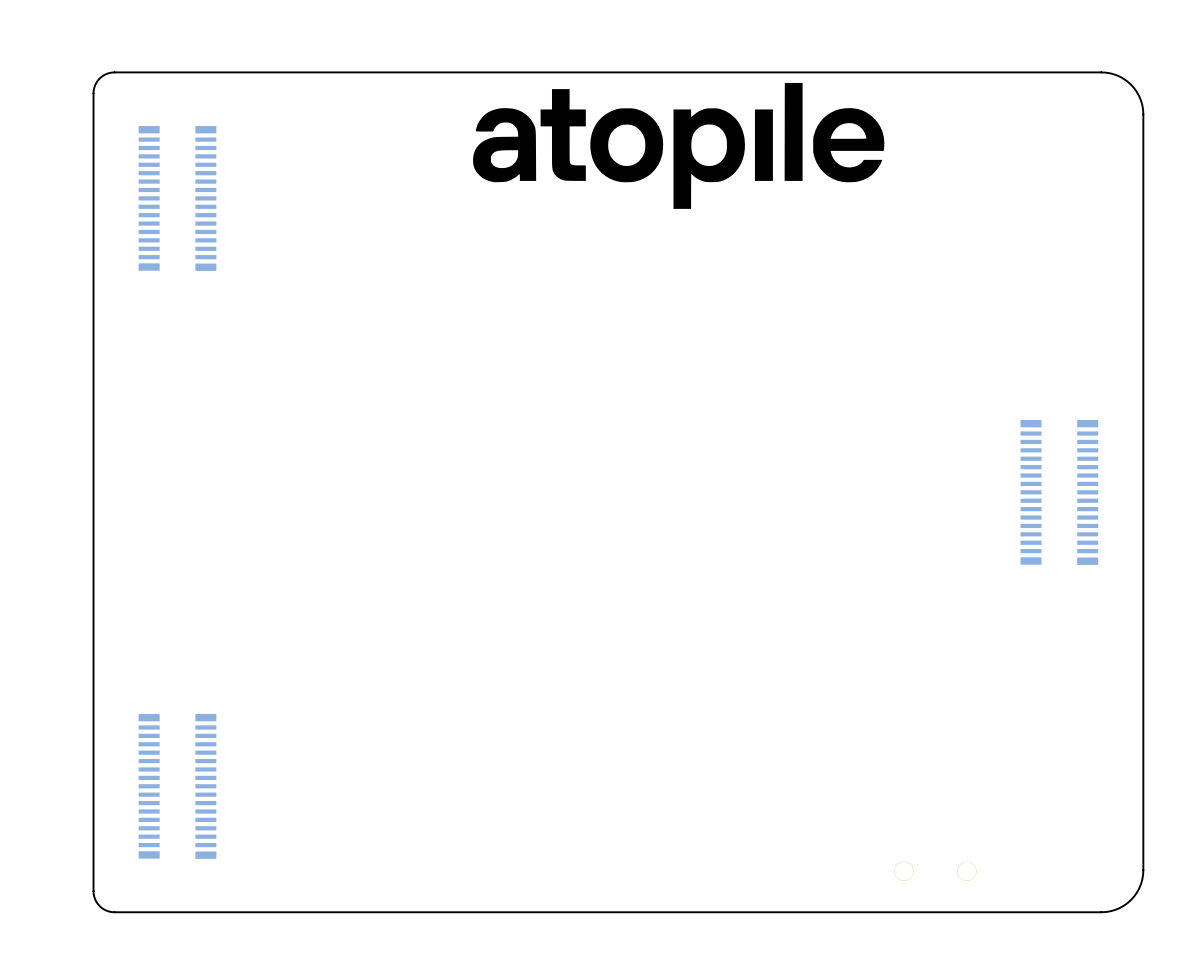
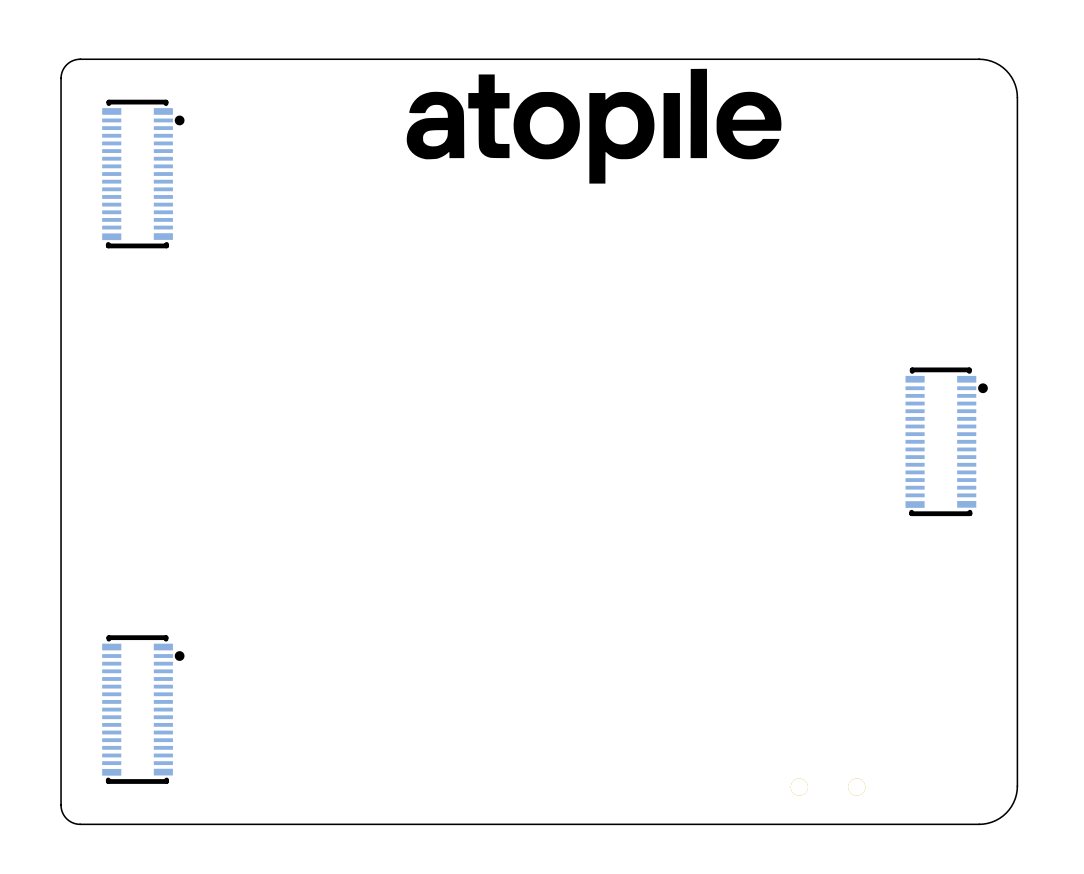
part footprint: [138, 126, 217, 271] -> [102, 99, 185, 249]
part footprint: [1020, 420, 1099, 565] -> [905, 367, 988, 517]
part footprint: [138, 713, 217, 859] -> [102, 635, 185, 784]

